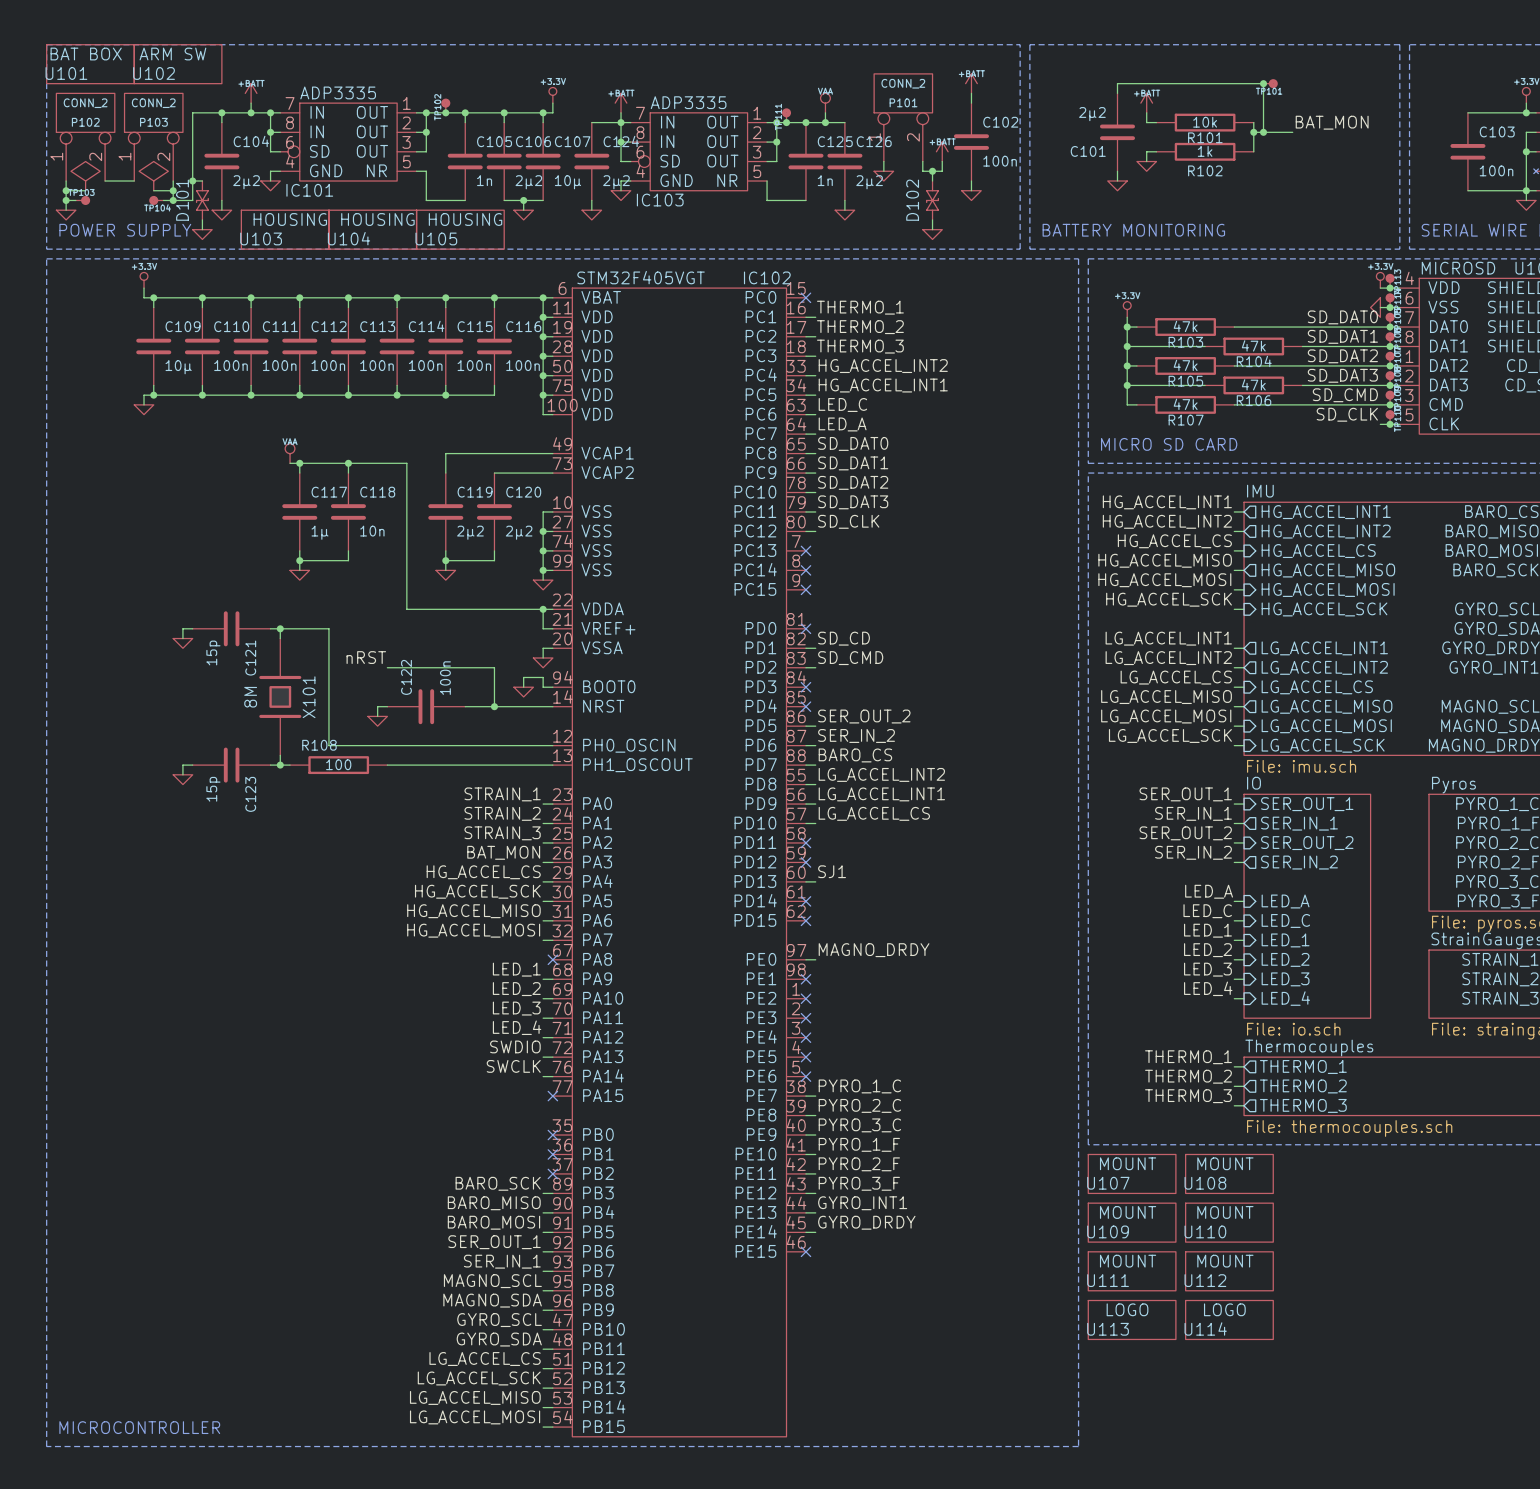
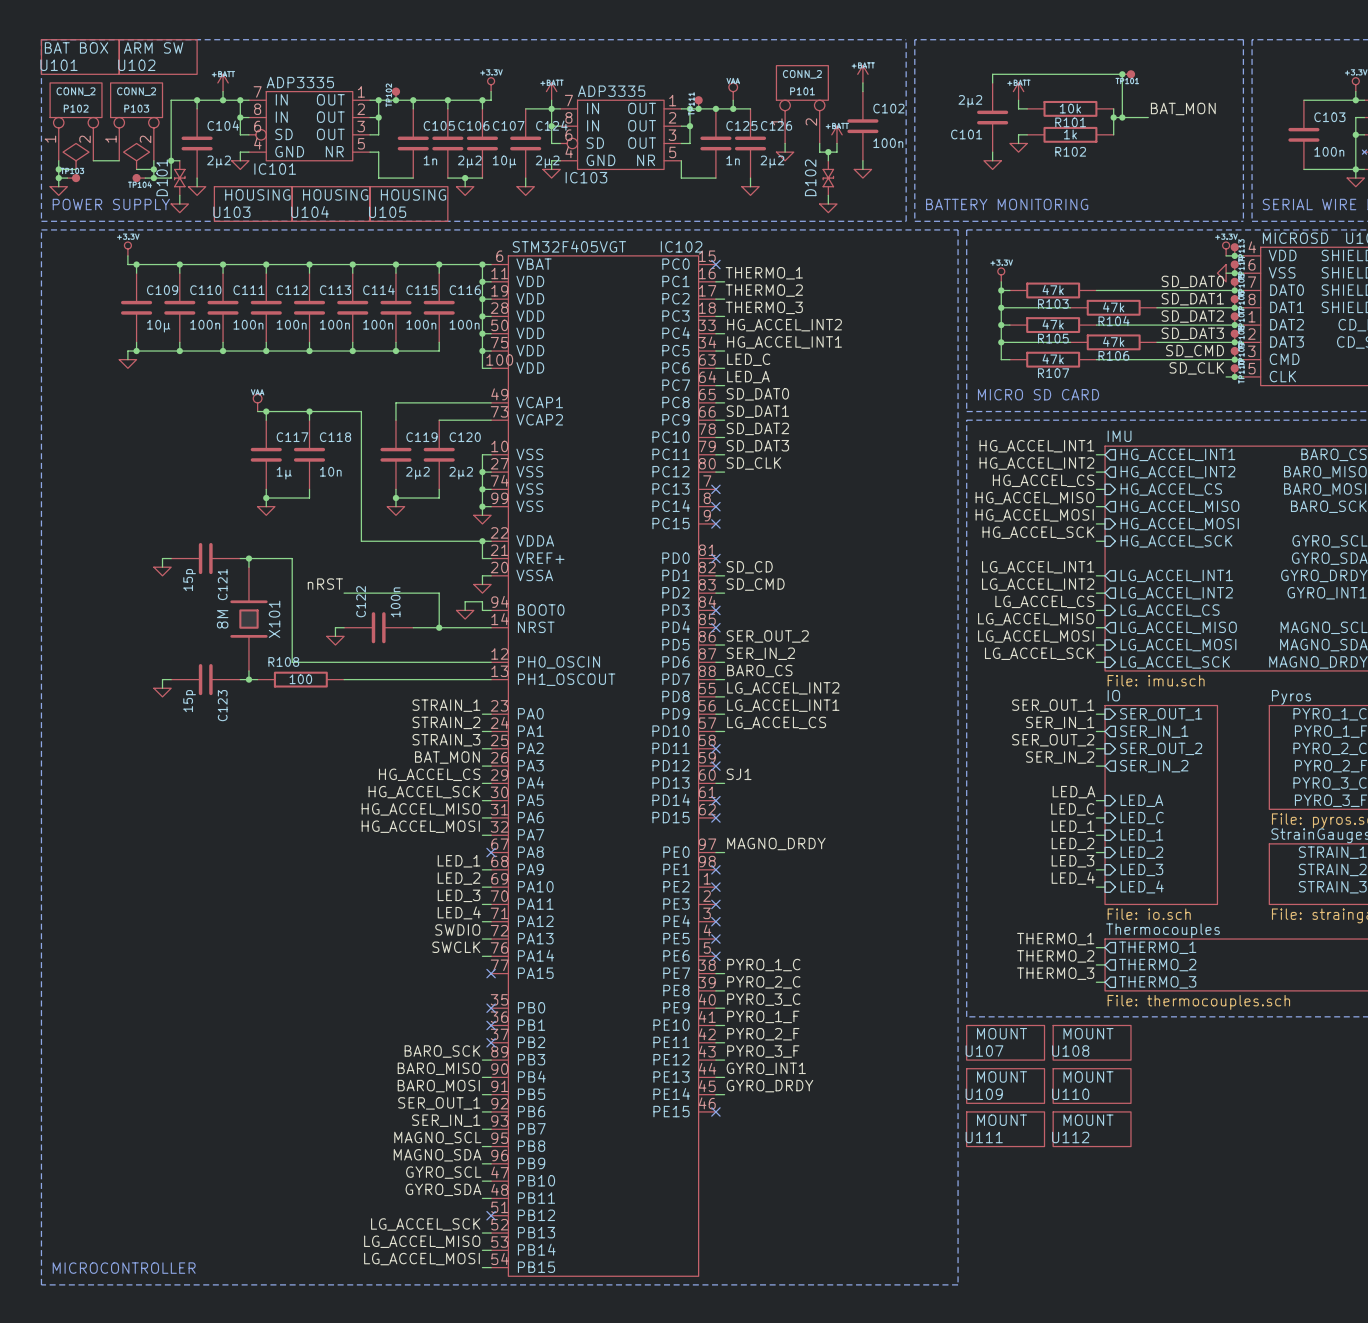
U113: LOGO (1132, 1319) -> none
U114: LOGO (1229, 1319) -> none
label: LG_ACCEL_CS (485, 1359) -> none
wire: (543, 1368) (552, 1368) -> none
no-connect mark: none -> (491, 1215)

